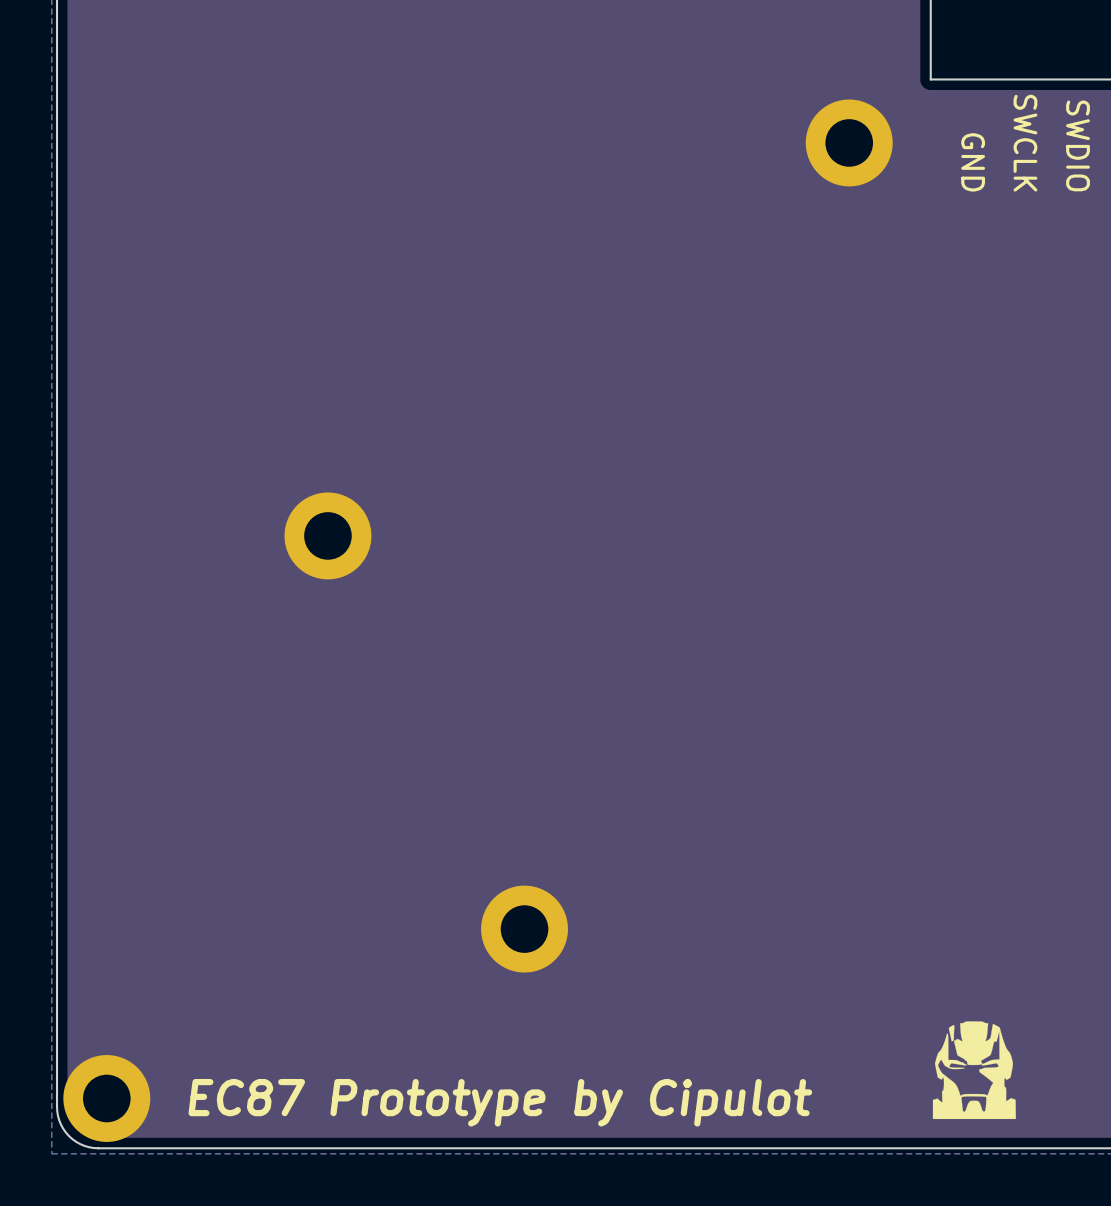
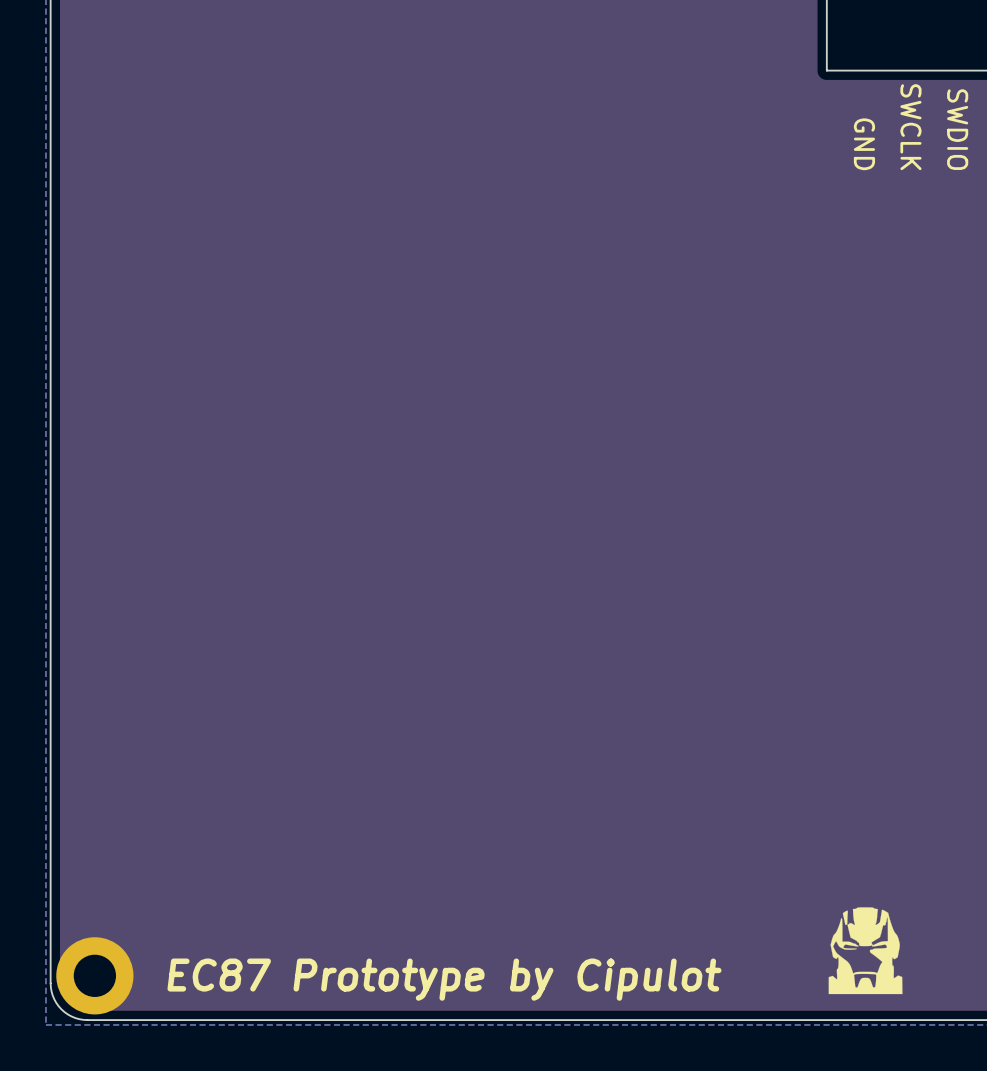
part: (849, 142) -> none
part: (327, 535) -> none
part: (524, 929) -> none

